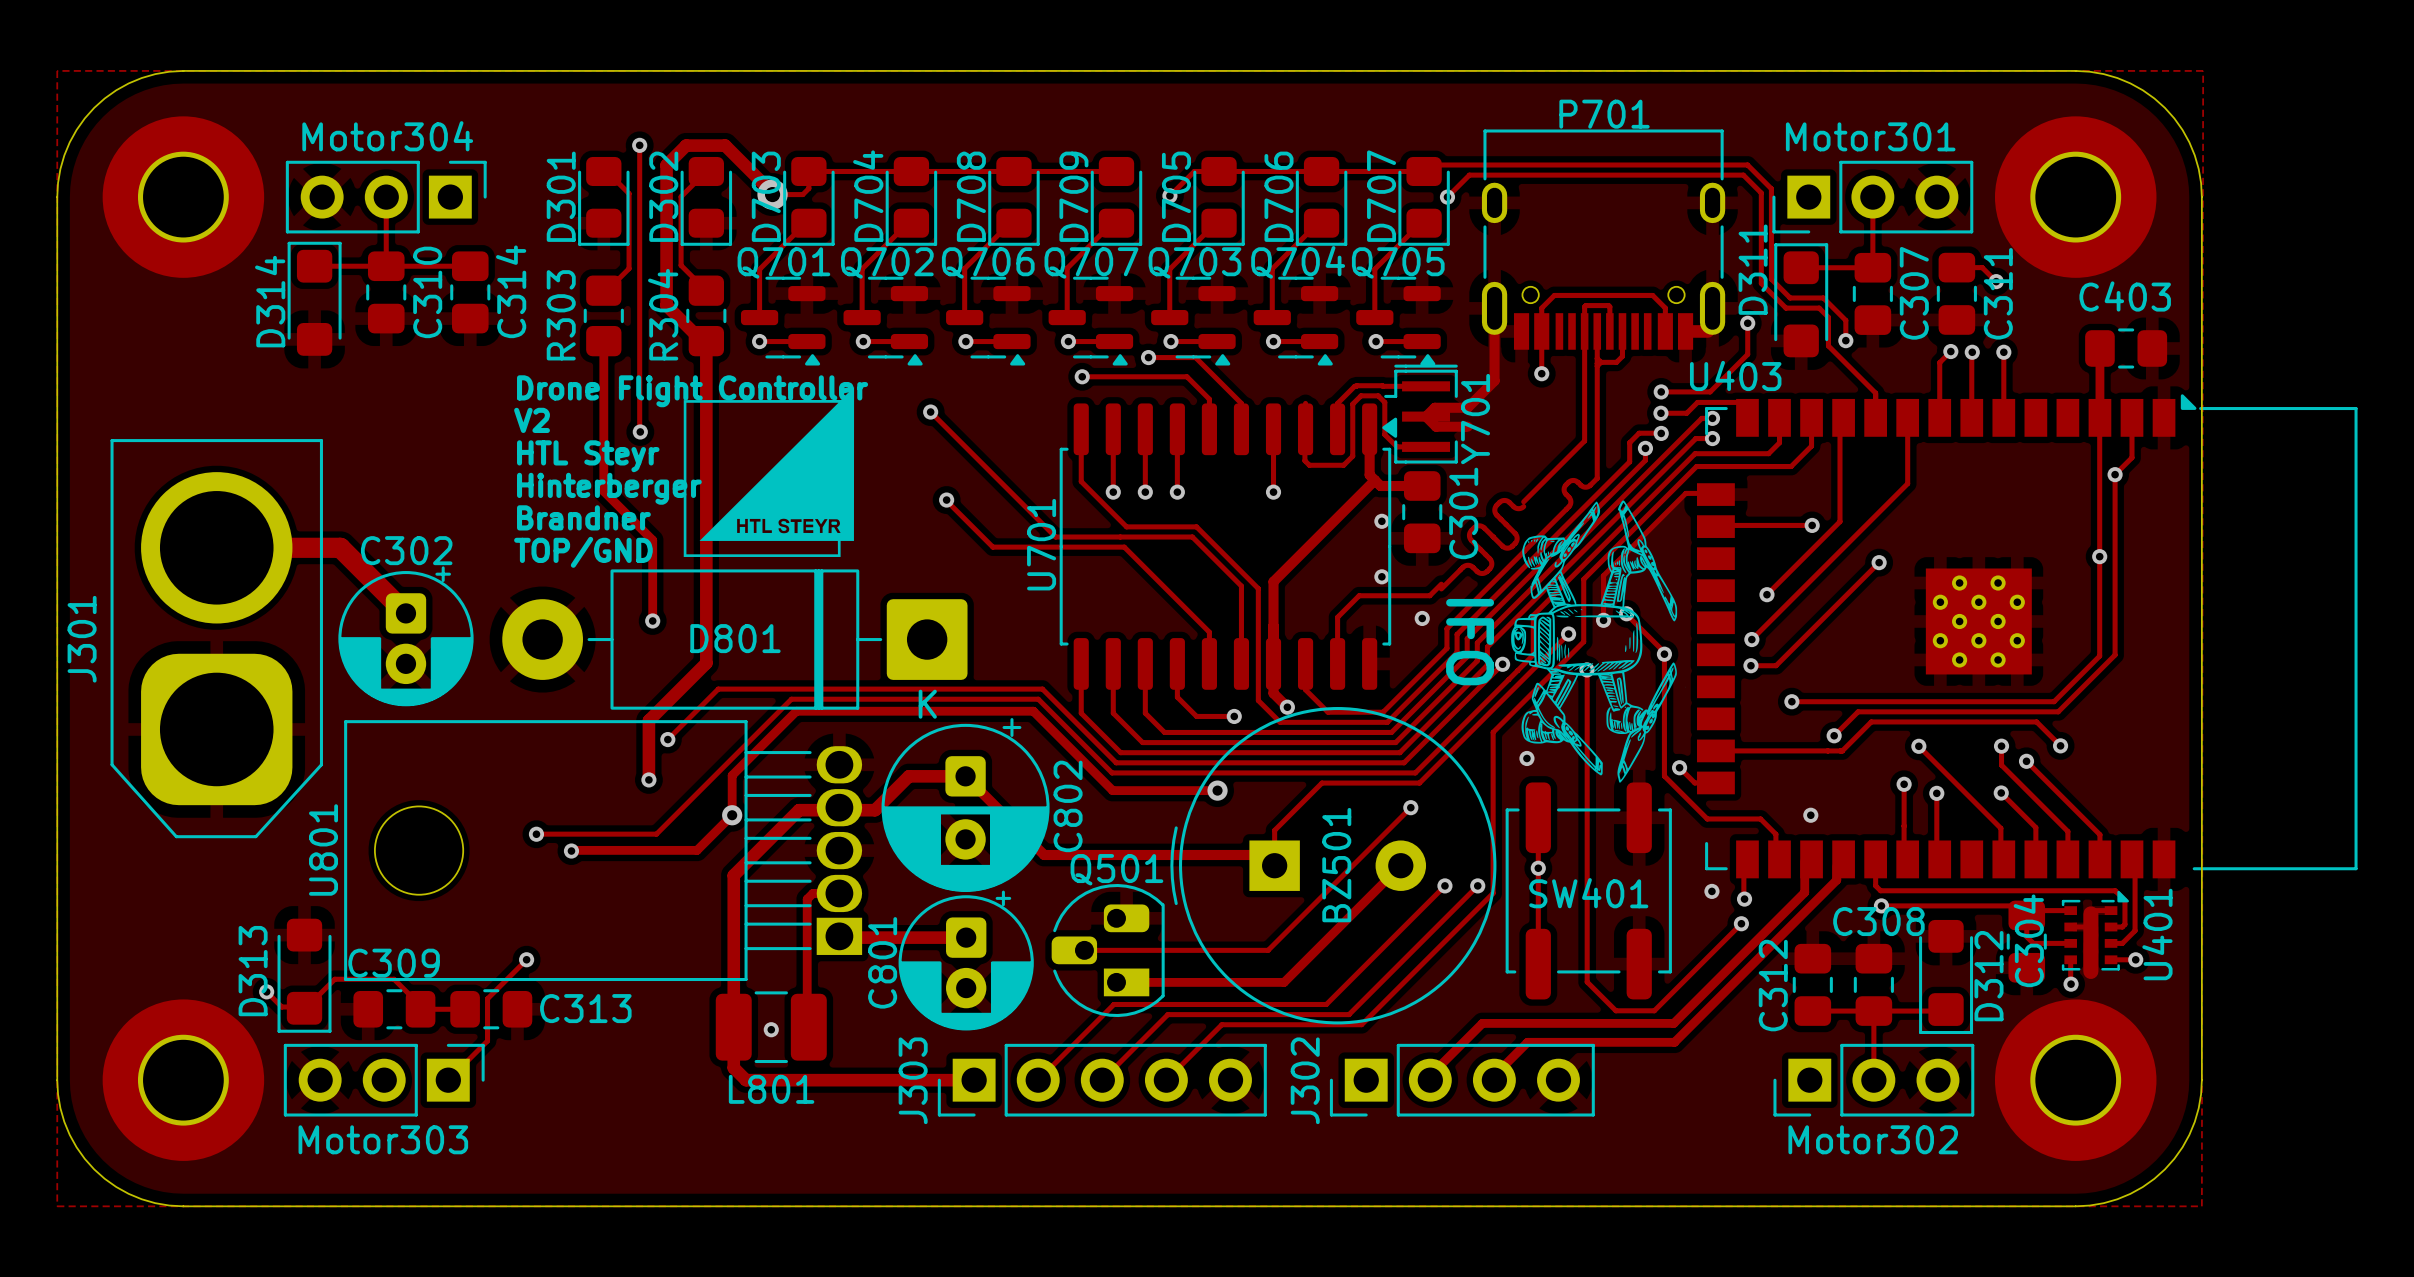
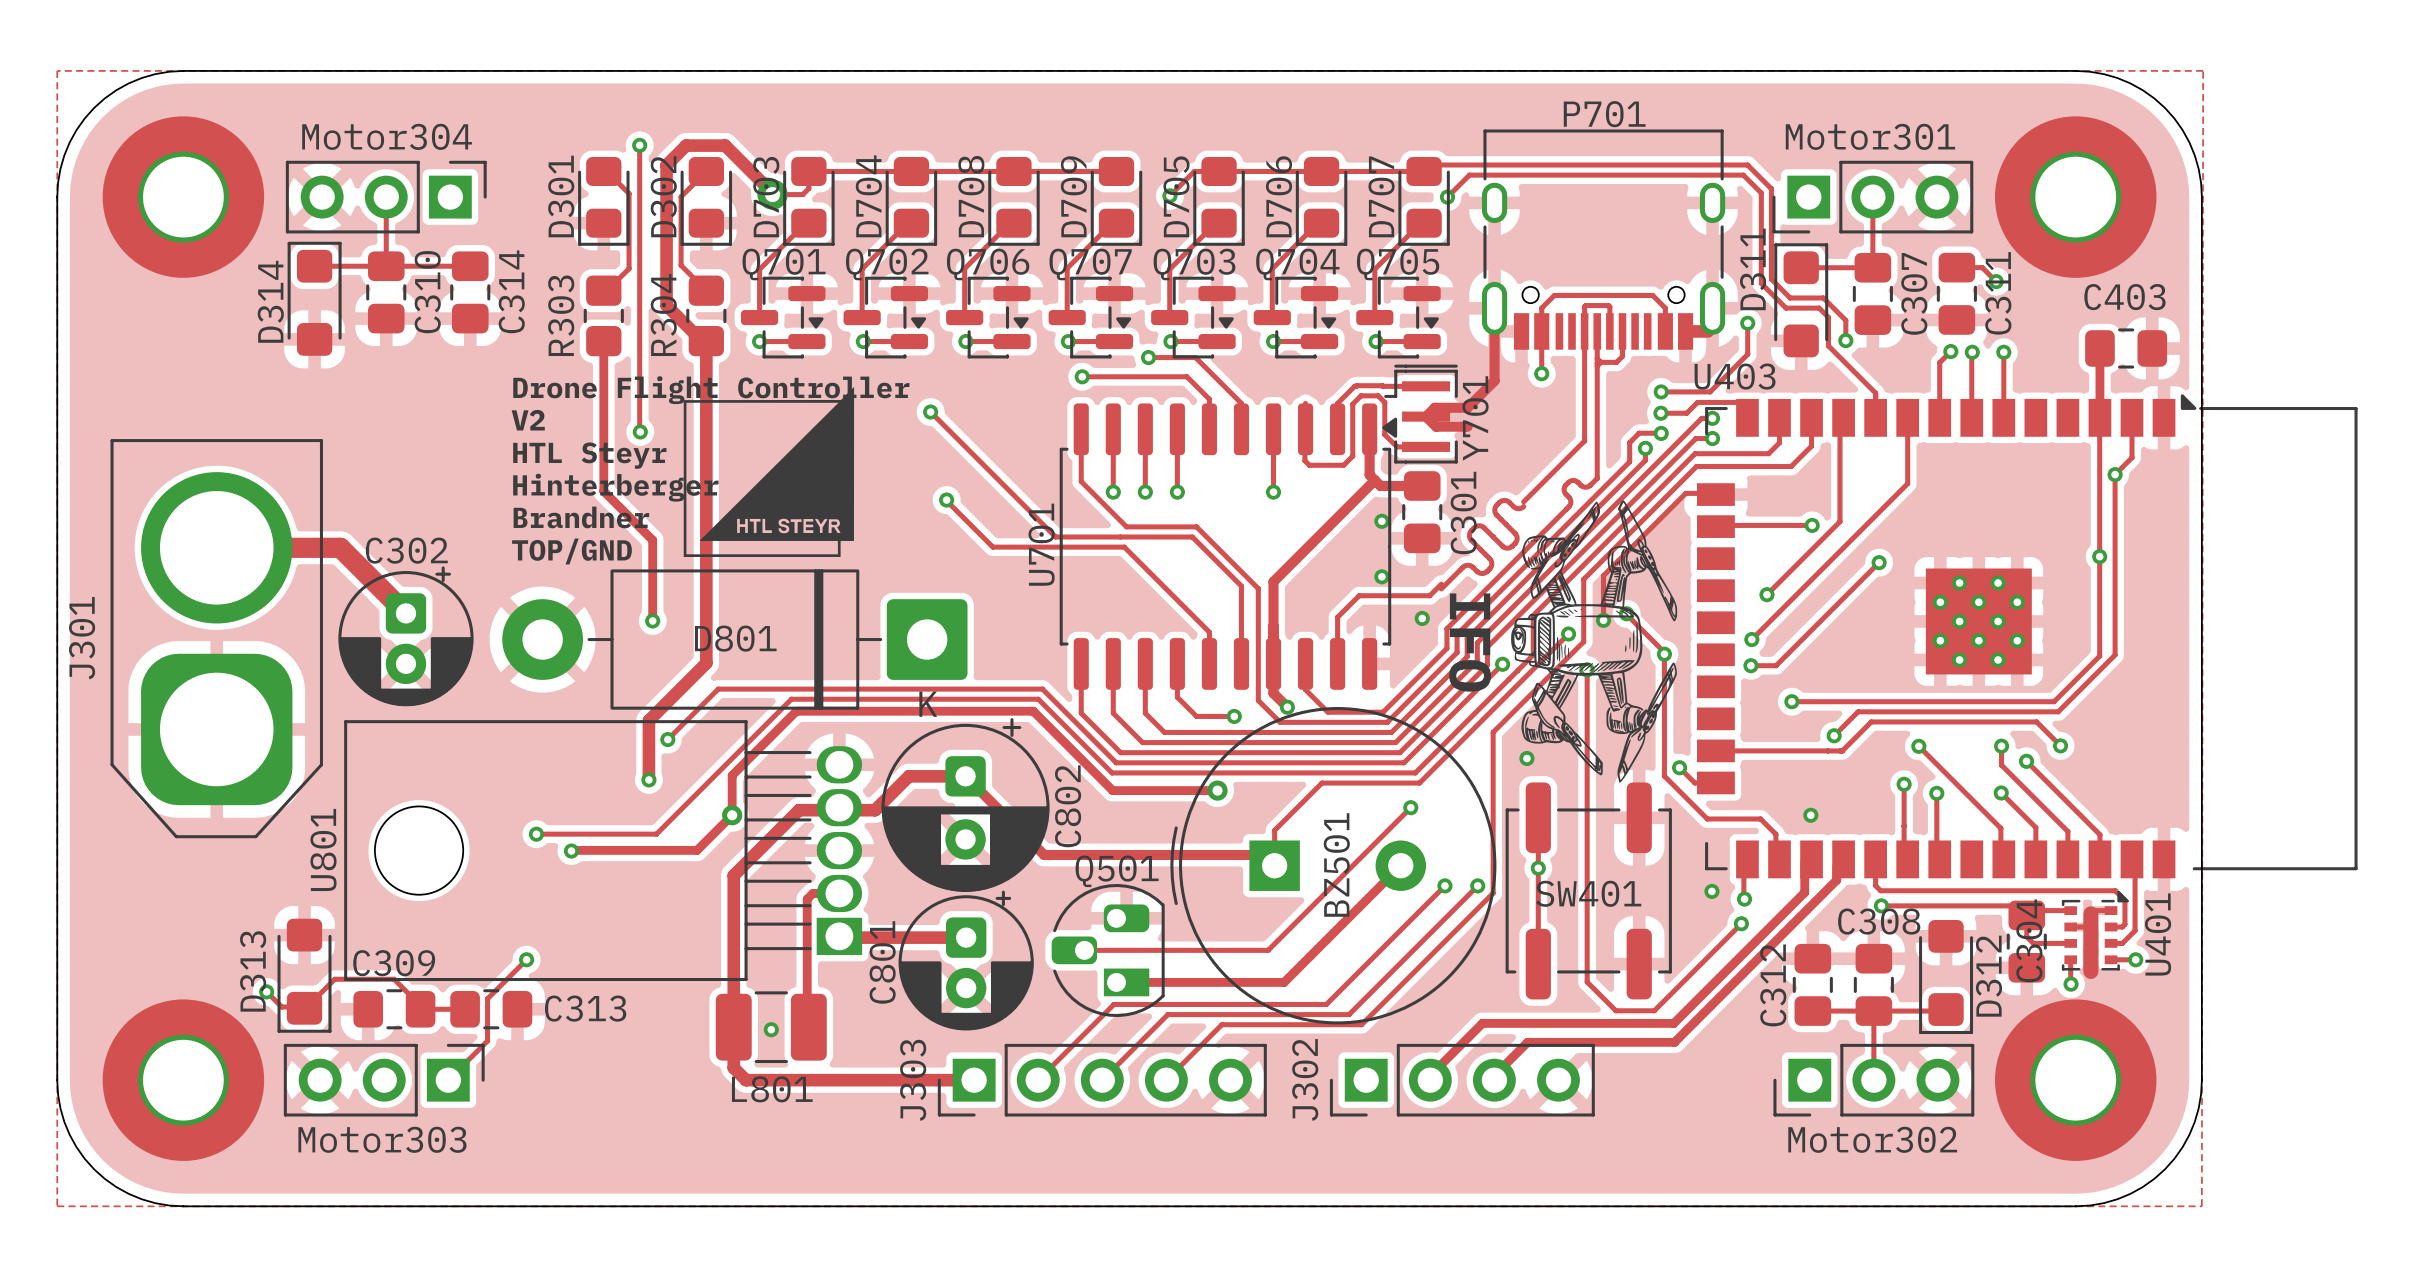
Q701 footprint: [740, 276, 826, 366] -> [740, 276, 826, 359]
Q702 footprint: [843, 276, 929, 366] -> [843, 276, 929, 359]
Q706 footprint: [946, 276, 1031, 366] -> [946, 276, 1031, 359]
Q707 footprint: [1048, 276, 1134, 366] -> [1048, 276, 1134, 359]
Q703 footprint: [1151, 276, 1236, 366] -> [1151, 276, 1236, 359]
Q704 footprint: [1253, 276, 1339, 366] -> [1253, 276, 1339, 359]
Q705 footprint: [1356, 276, 1441, 366] -> [1356, 276, 1441, 359]

